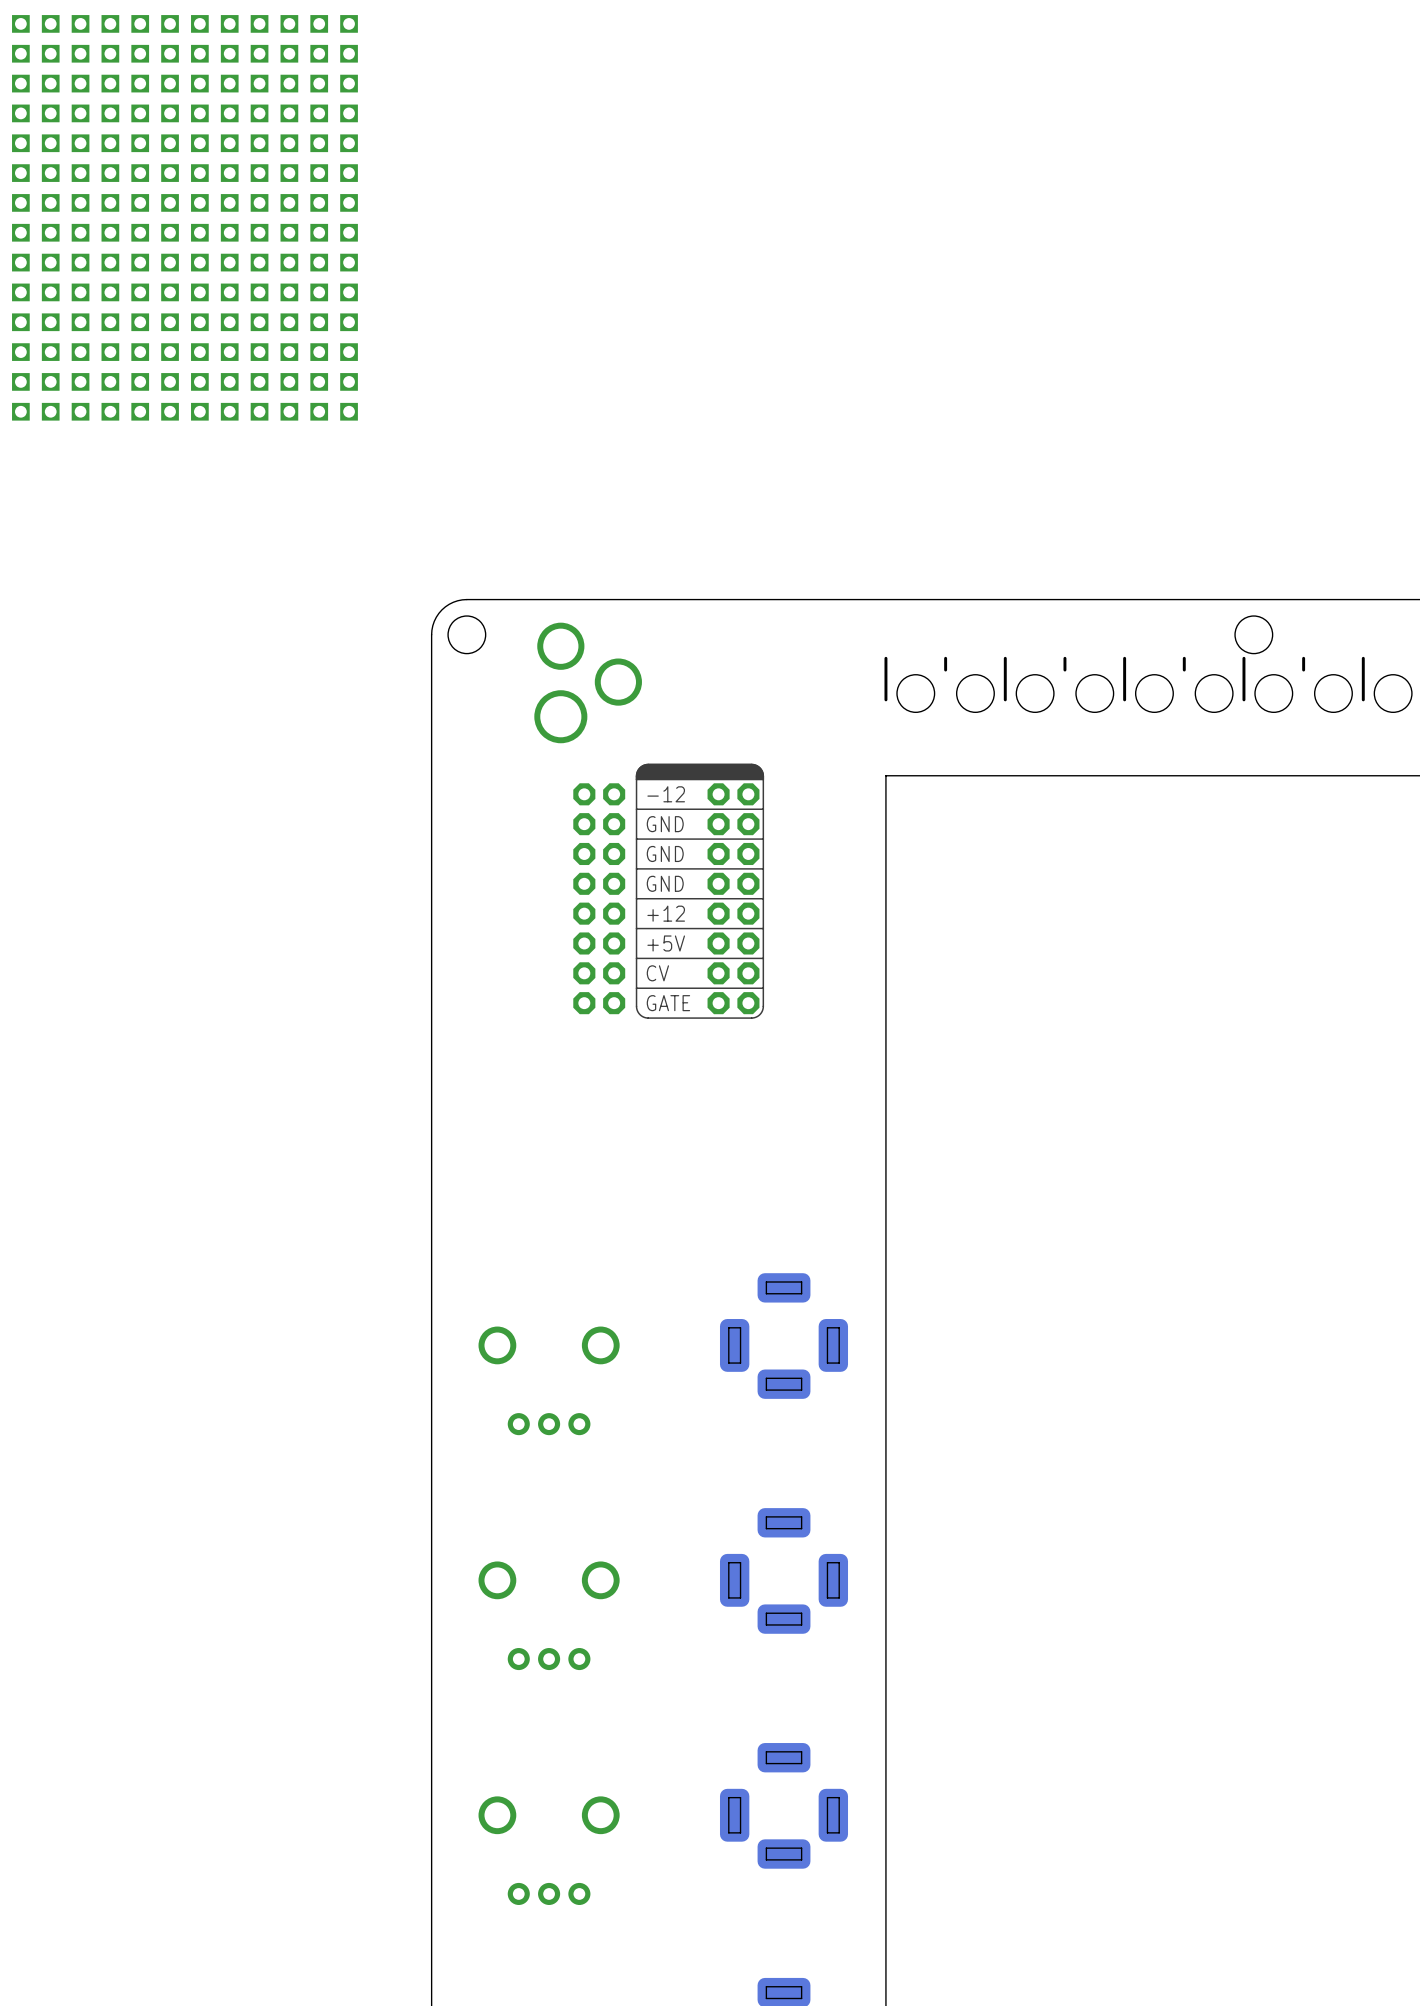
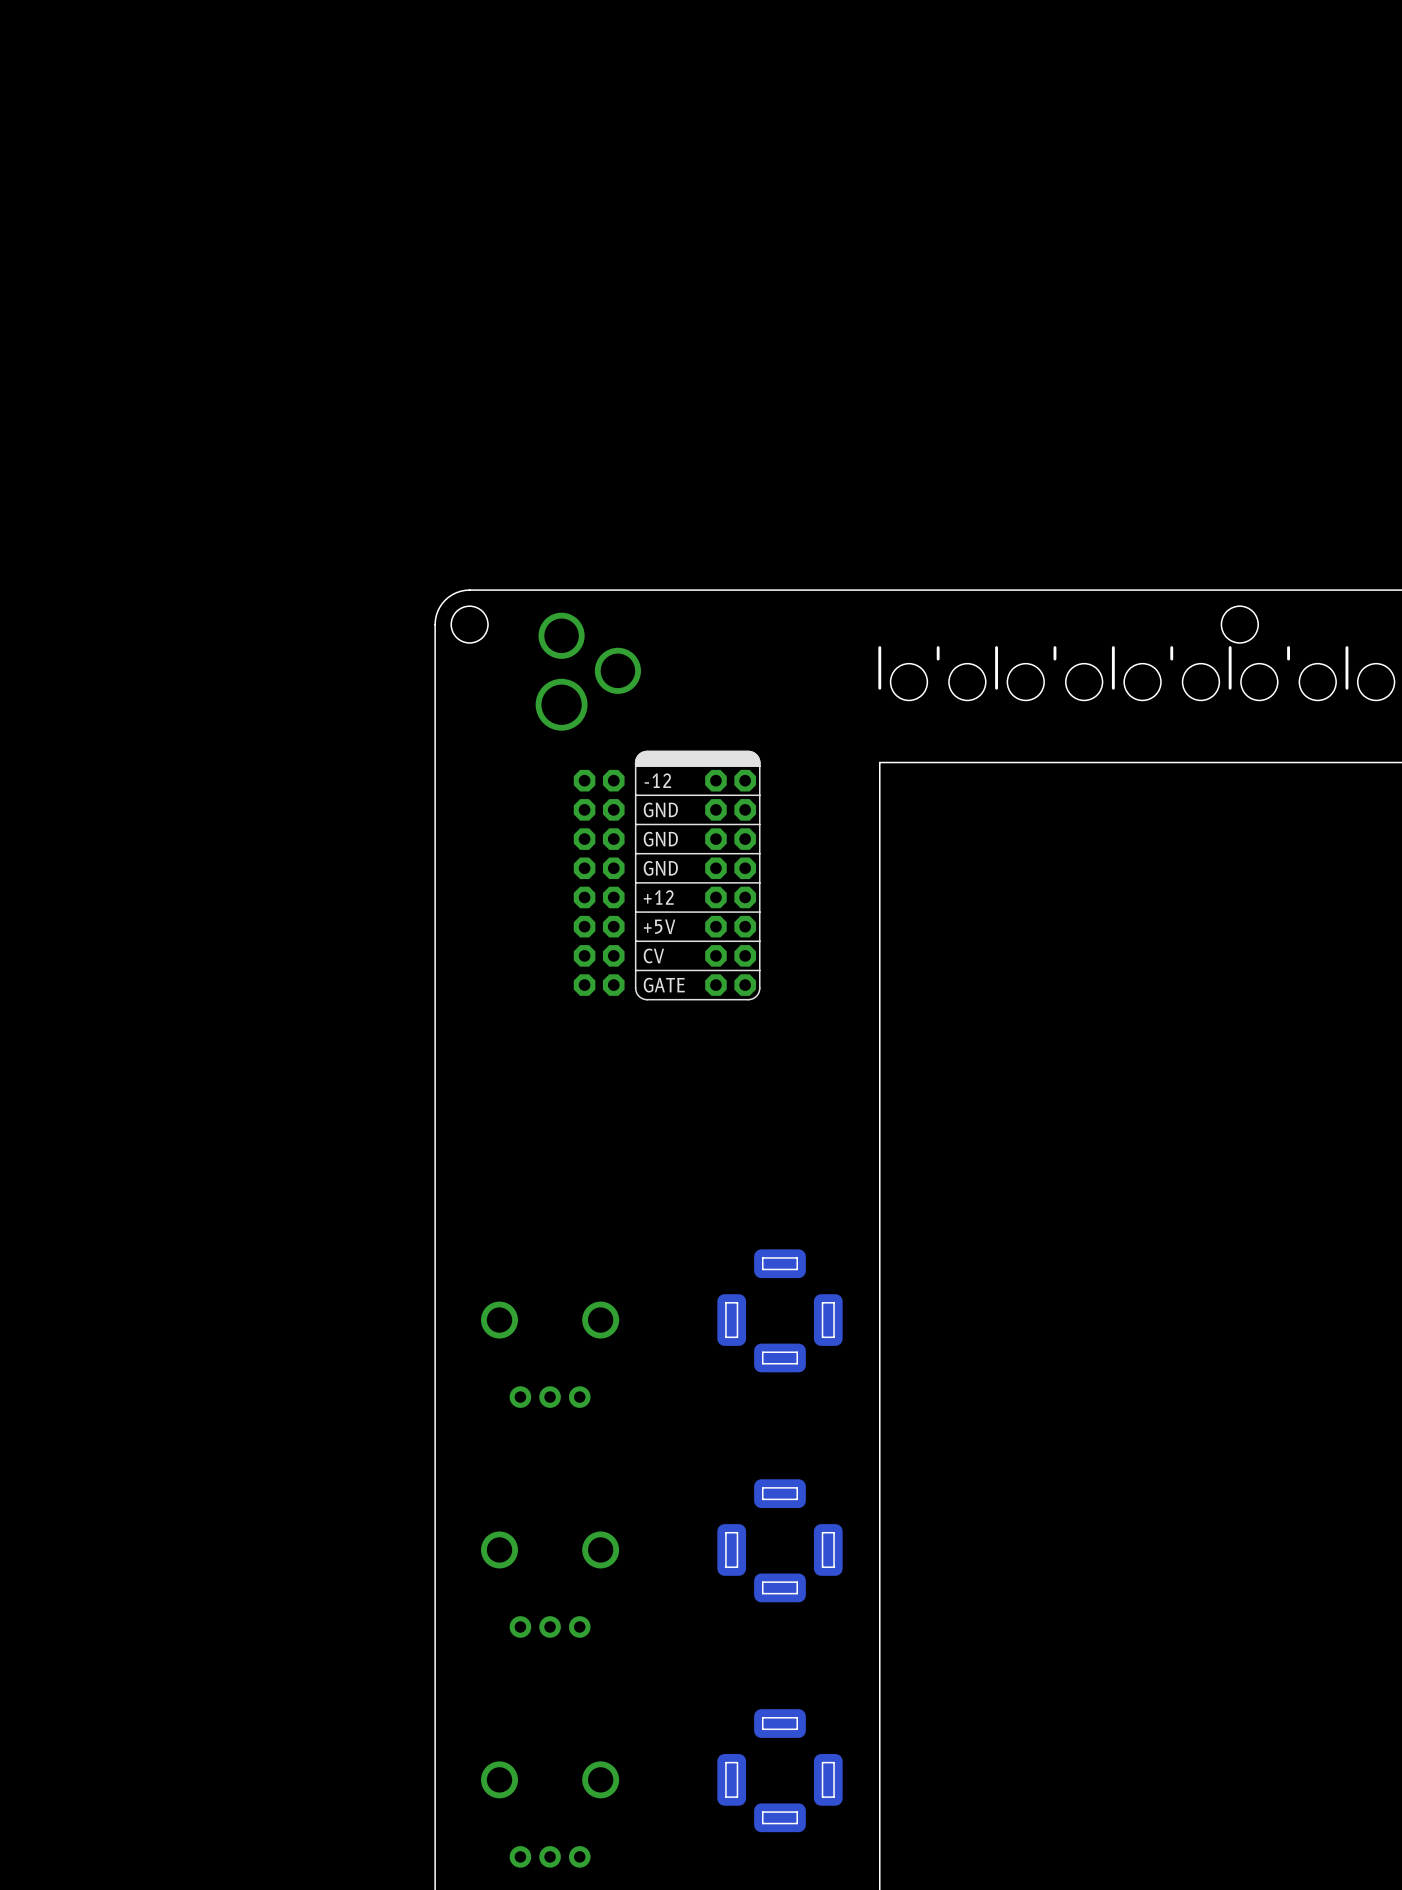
part: (184, 217) -> none

